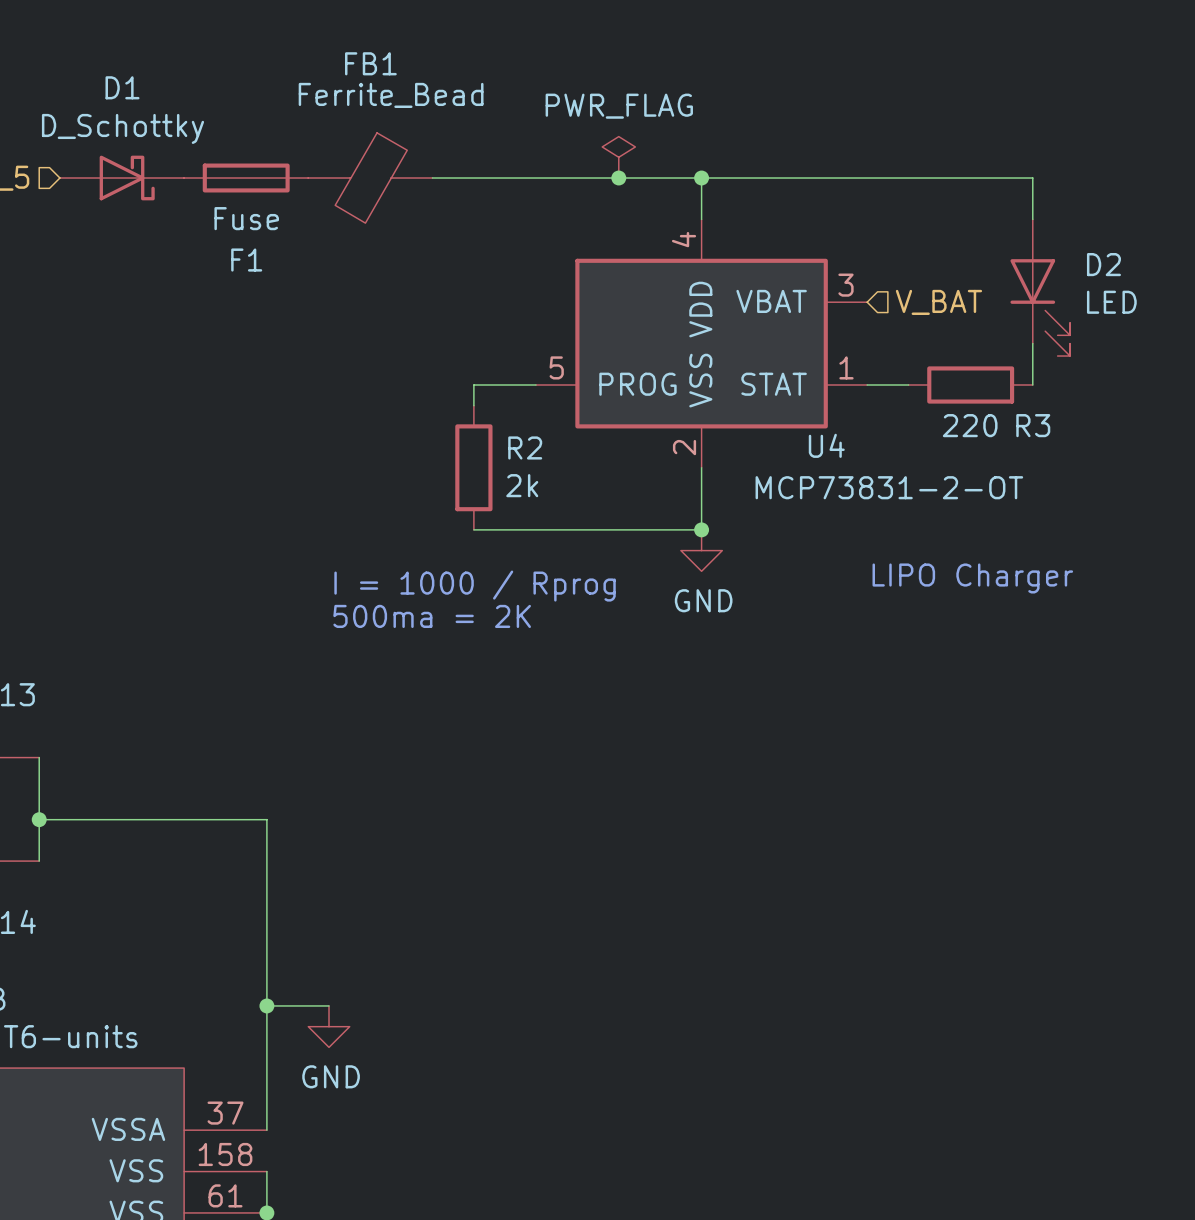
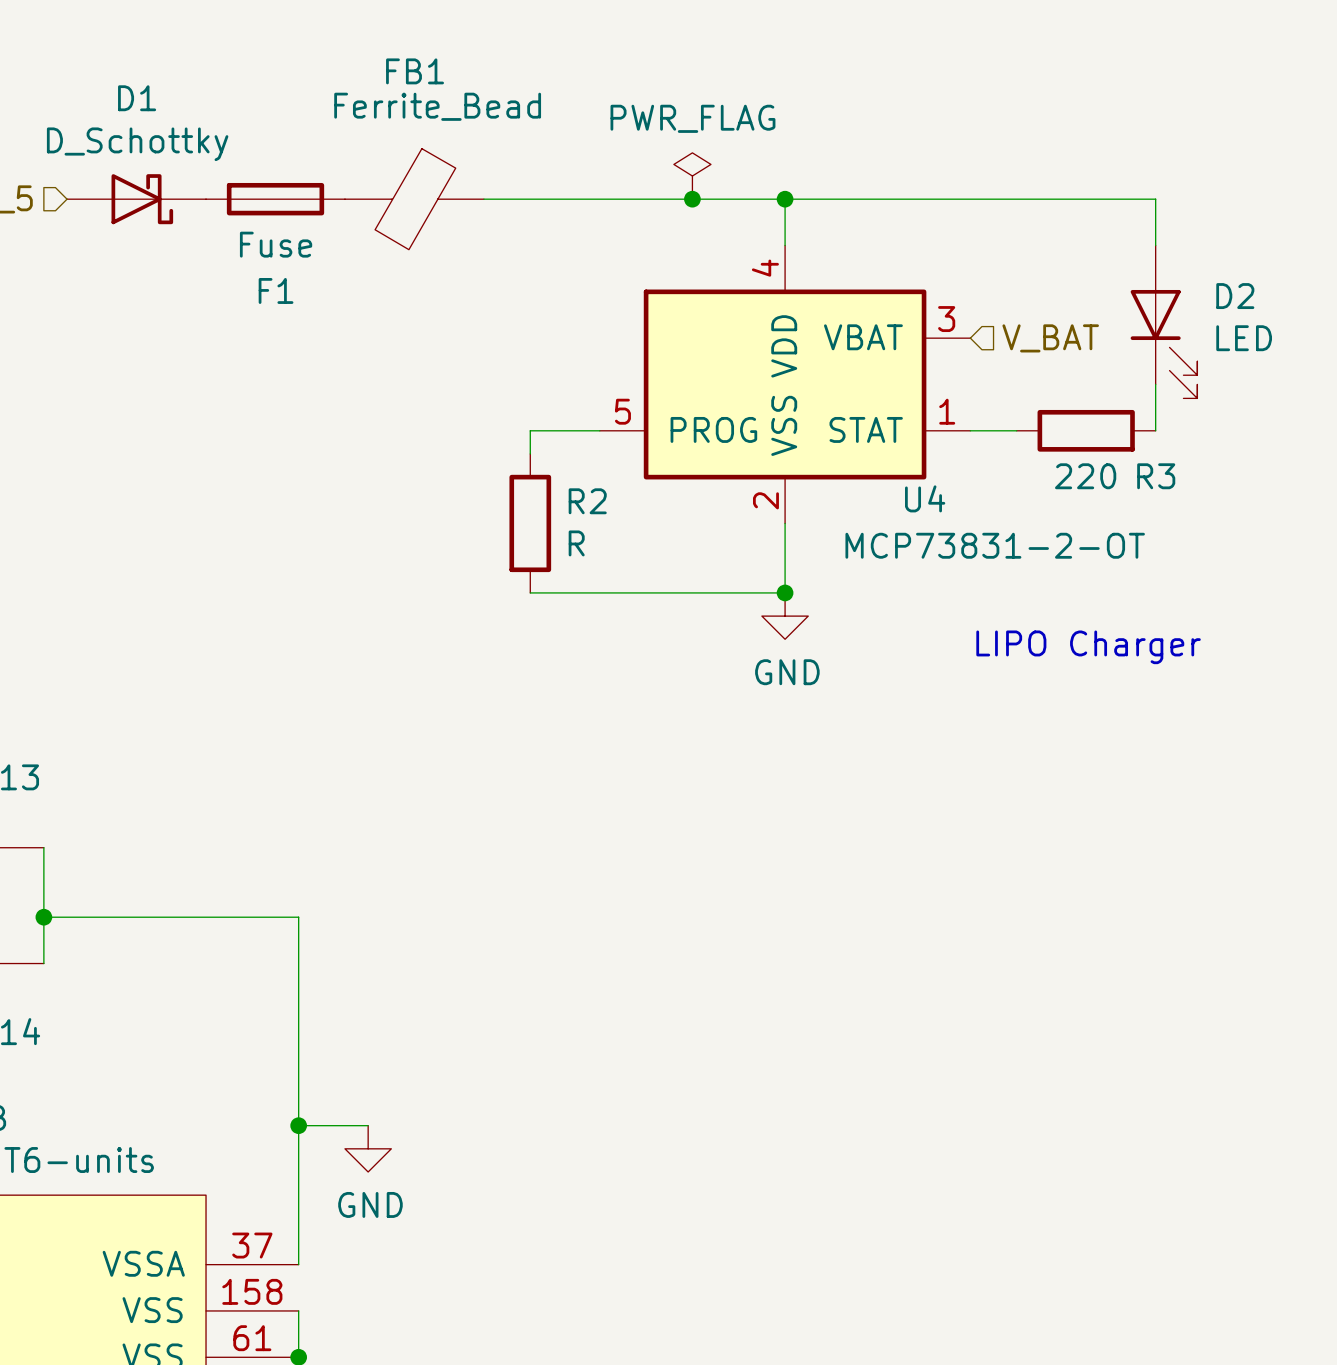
R2 value: 2k (522, 485) -> R (576, 543)
text: I = 1000 / Rprog (475, 586) -> none
text: 500ma = 2K (432, 616) -> none

